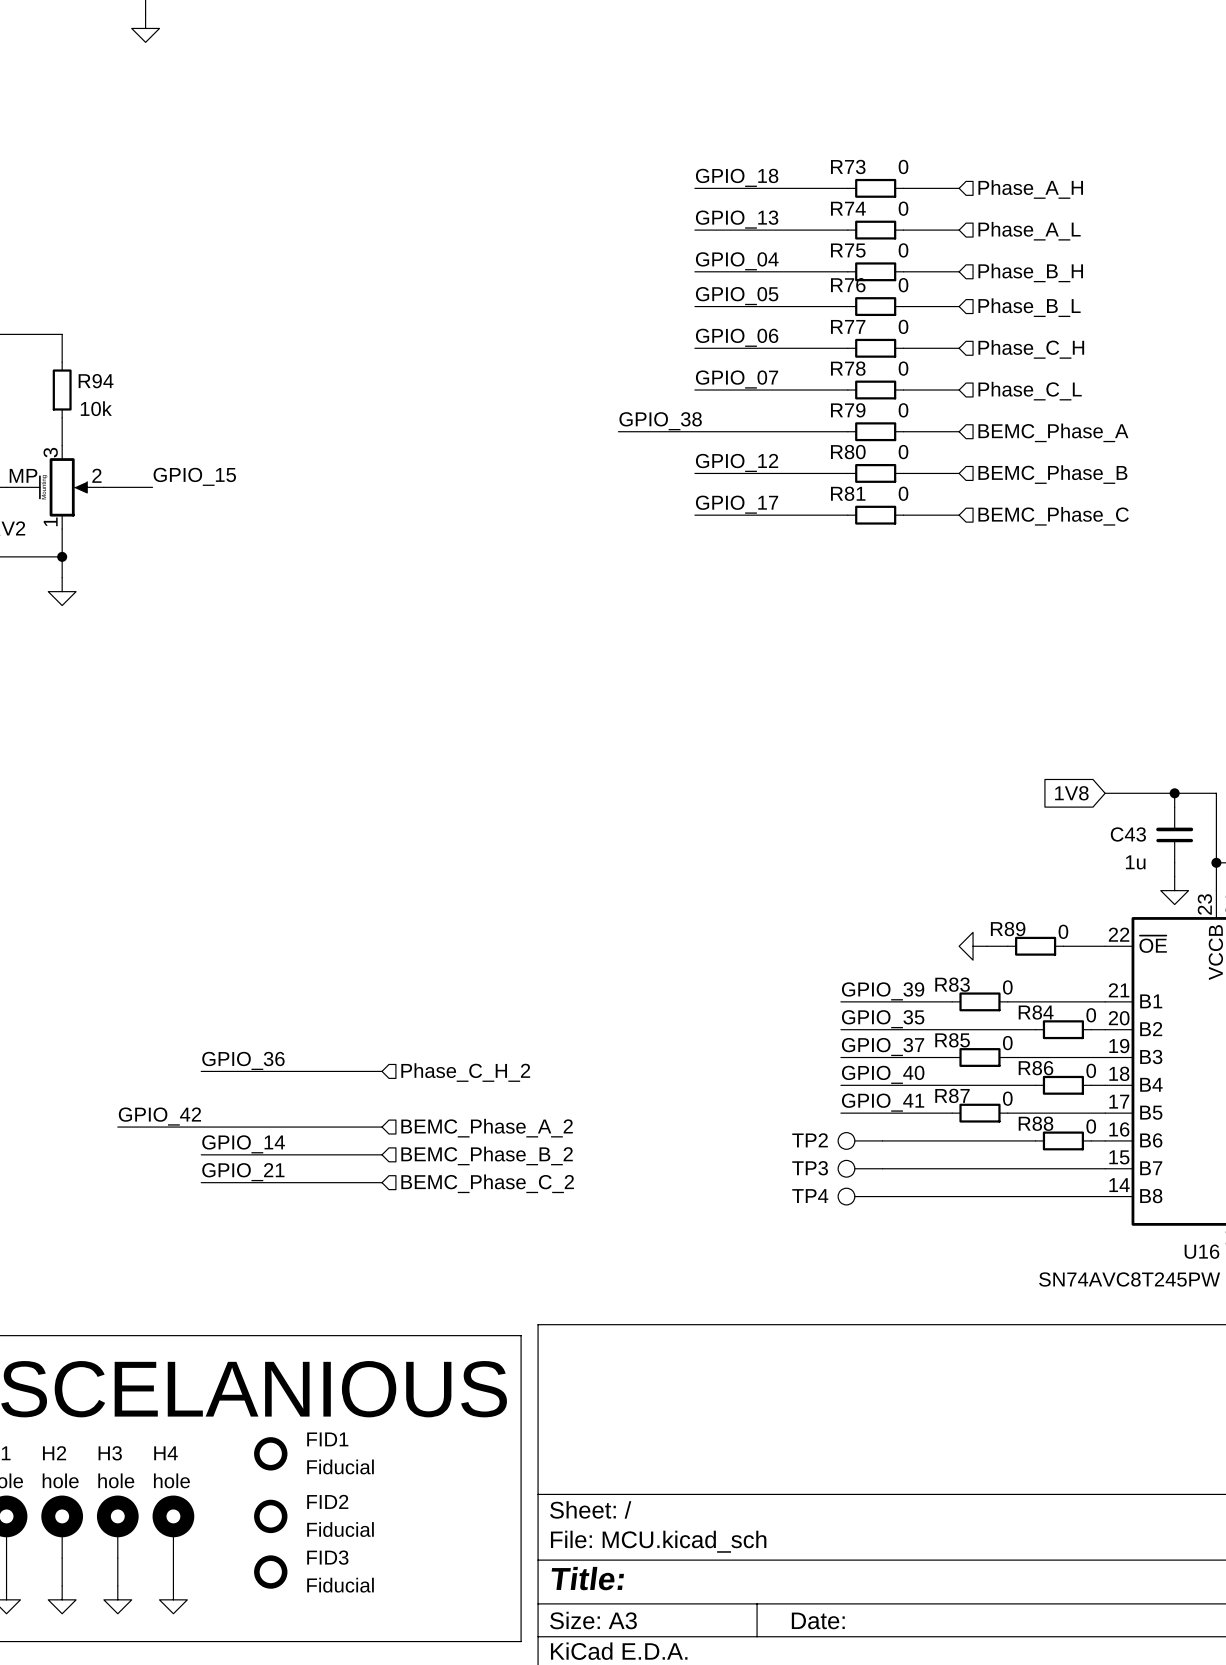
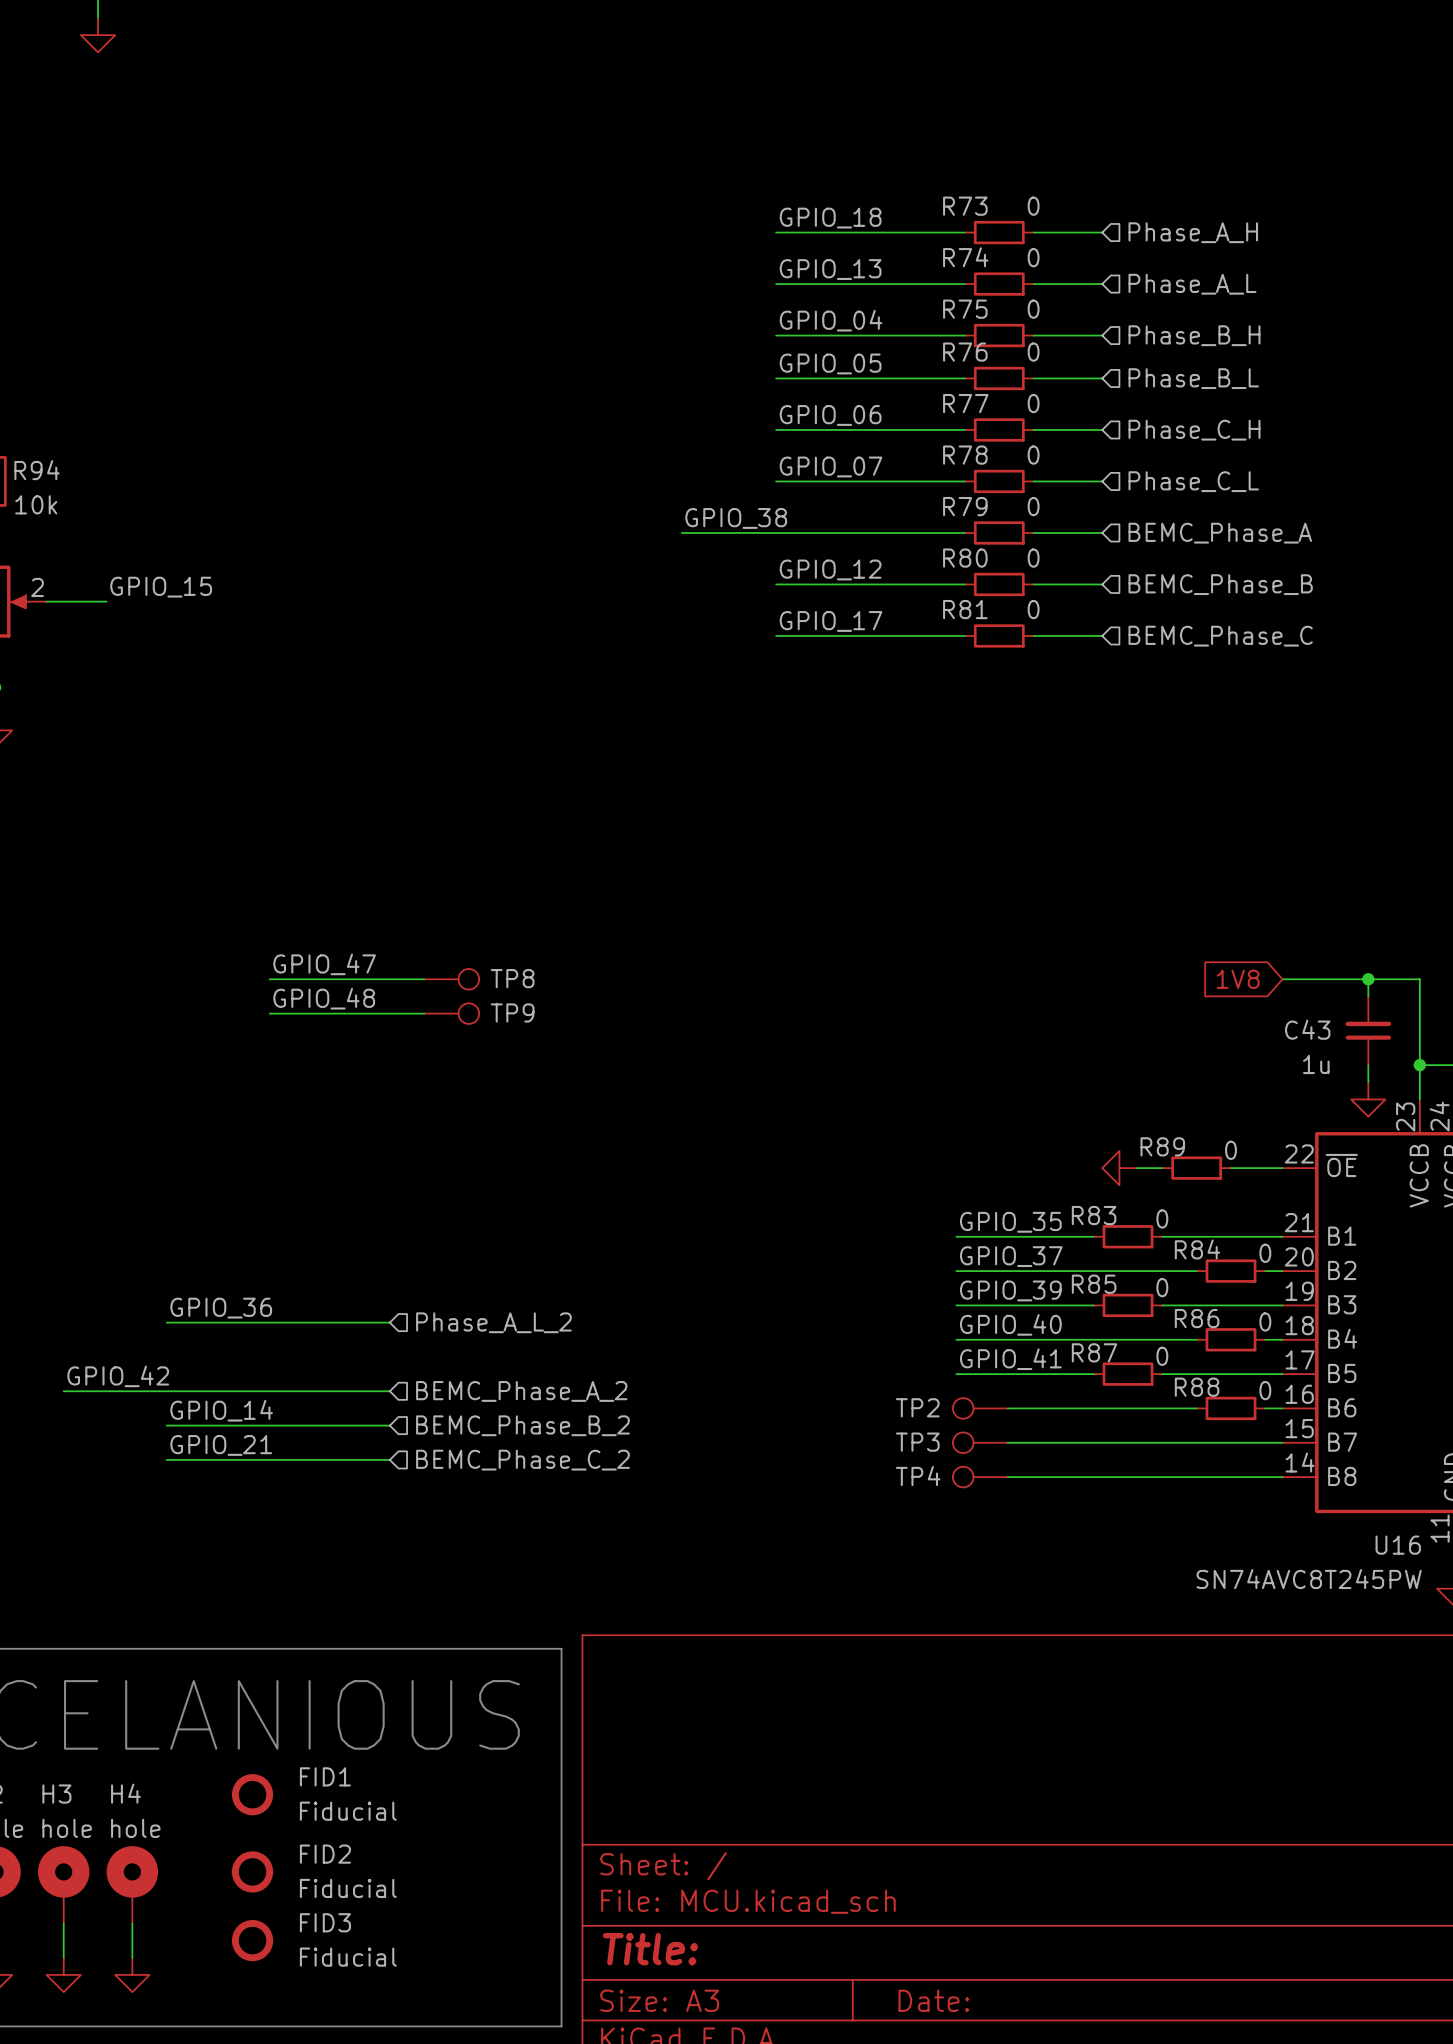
label: none -> GPIO_47 (324, 964)
wire: none -> (269, 979) (424, 979)
TP8: none -> (451, 979)
label: none -> GPIO_48 (324, 998)
wire: none -> (269, 1013) (424, 1013)
TP9: none -> (451, 1013)
label: GPIO_39 (883, 991) -> GPIO_35 (1010, 1222)
label: GPIO_35 (883, 1019) -> GPIO_37 (1011, 1256)
label: GPIO_37 (883, 1047) -> GPIO_39 (1010, 1290)
hierarchical label: Phase_C_H_2 (465, 1072) -> Phase_A_L_2 (493, 1322)

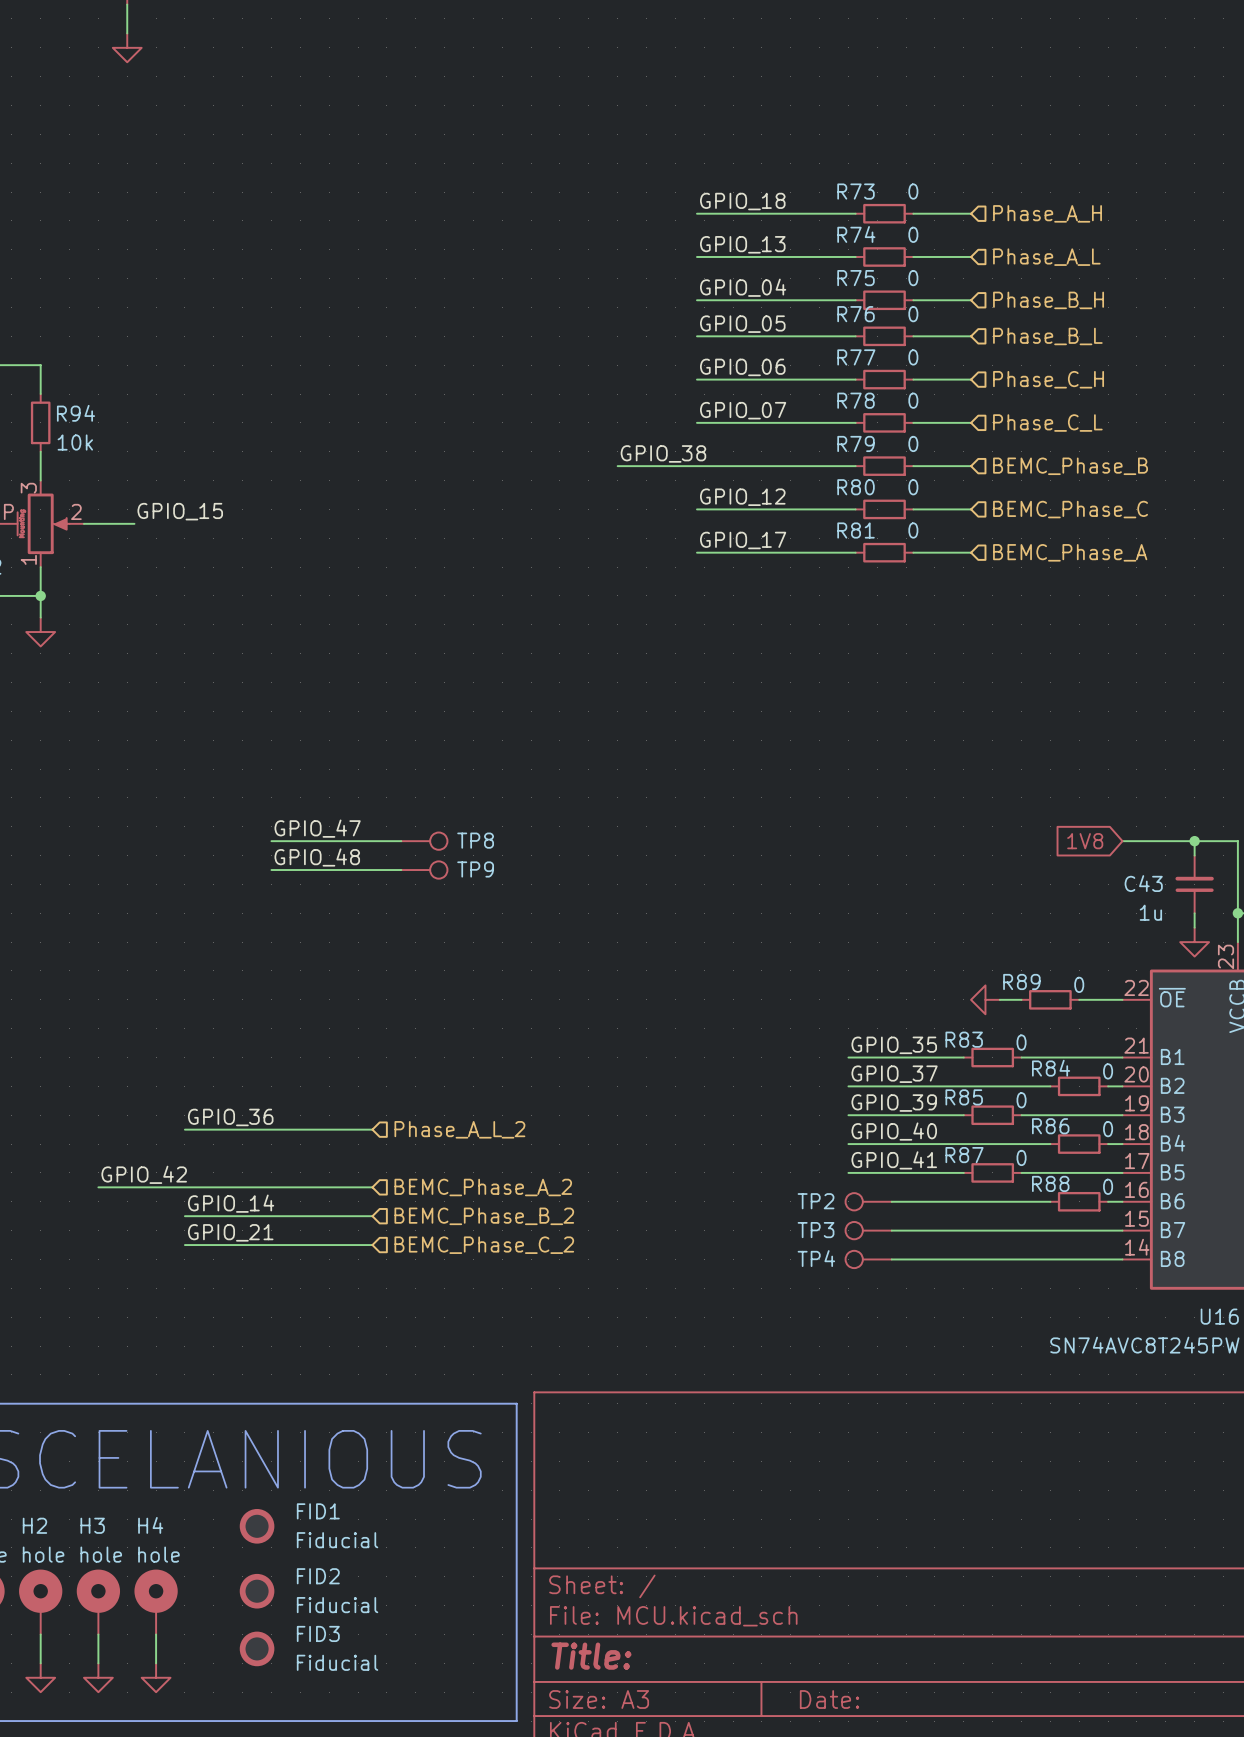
hierarchical label: BEMC_Phase_A (1220, 533) -> BEMC_Phase_B (1070, 466)
hierarchical label: BEMC_Phase_B (1220, 584) -> BEMC_Phase_C (1070, 509)
hierarchical label: BEMC_Phase_C (1220, 636) -> BEMC_Phase_A (1070, 552)

